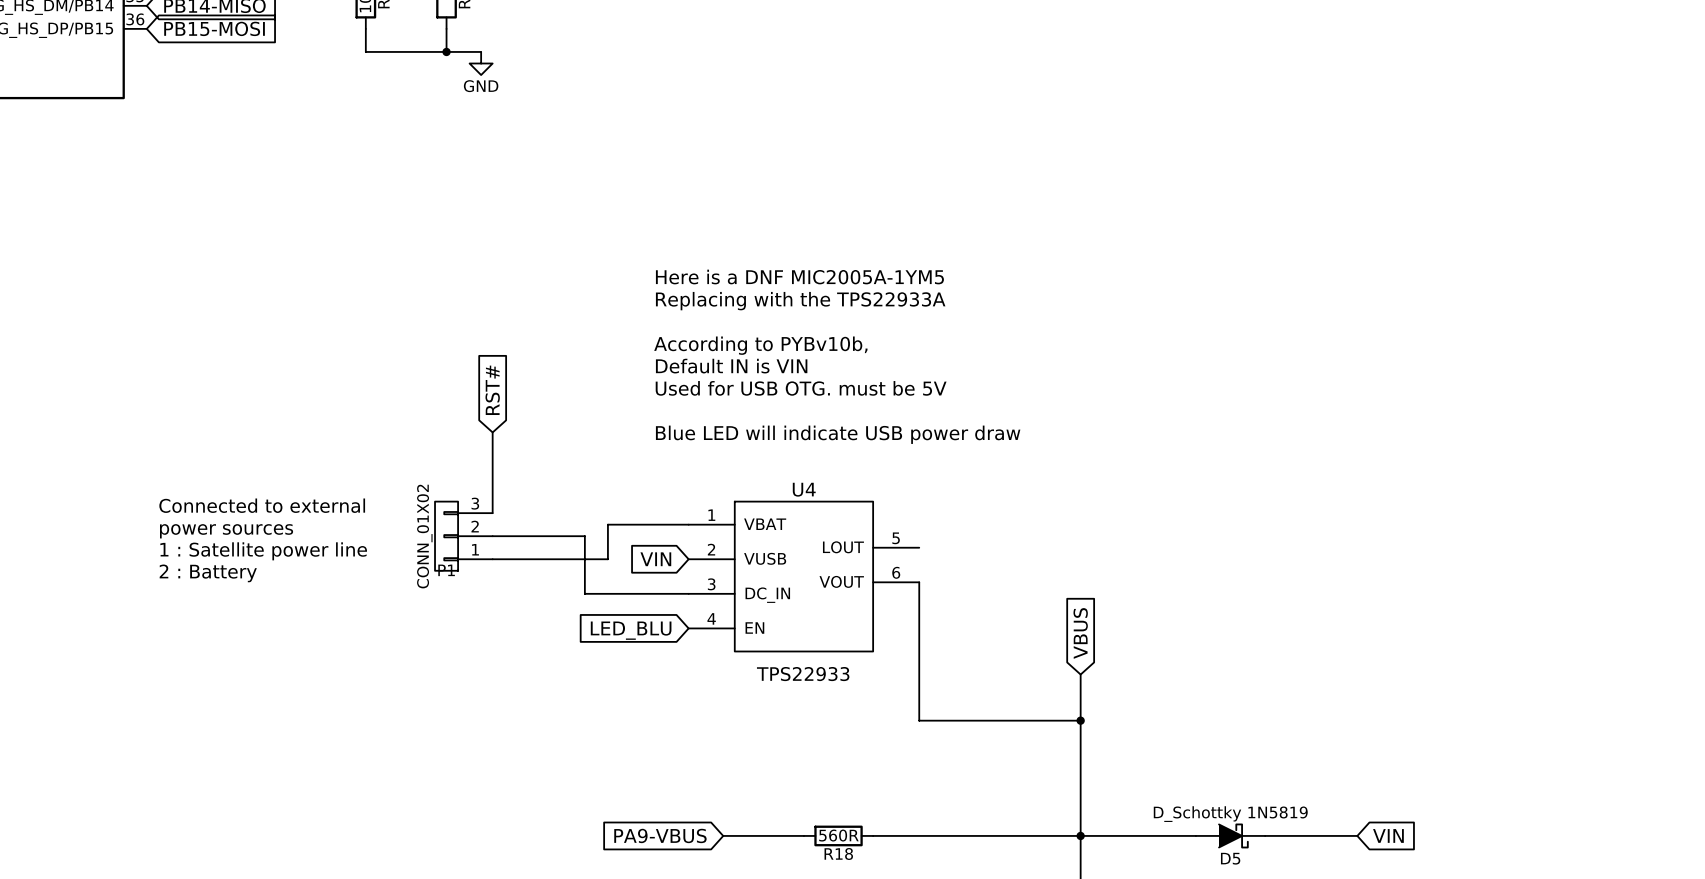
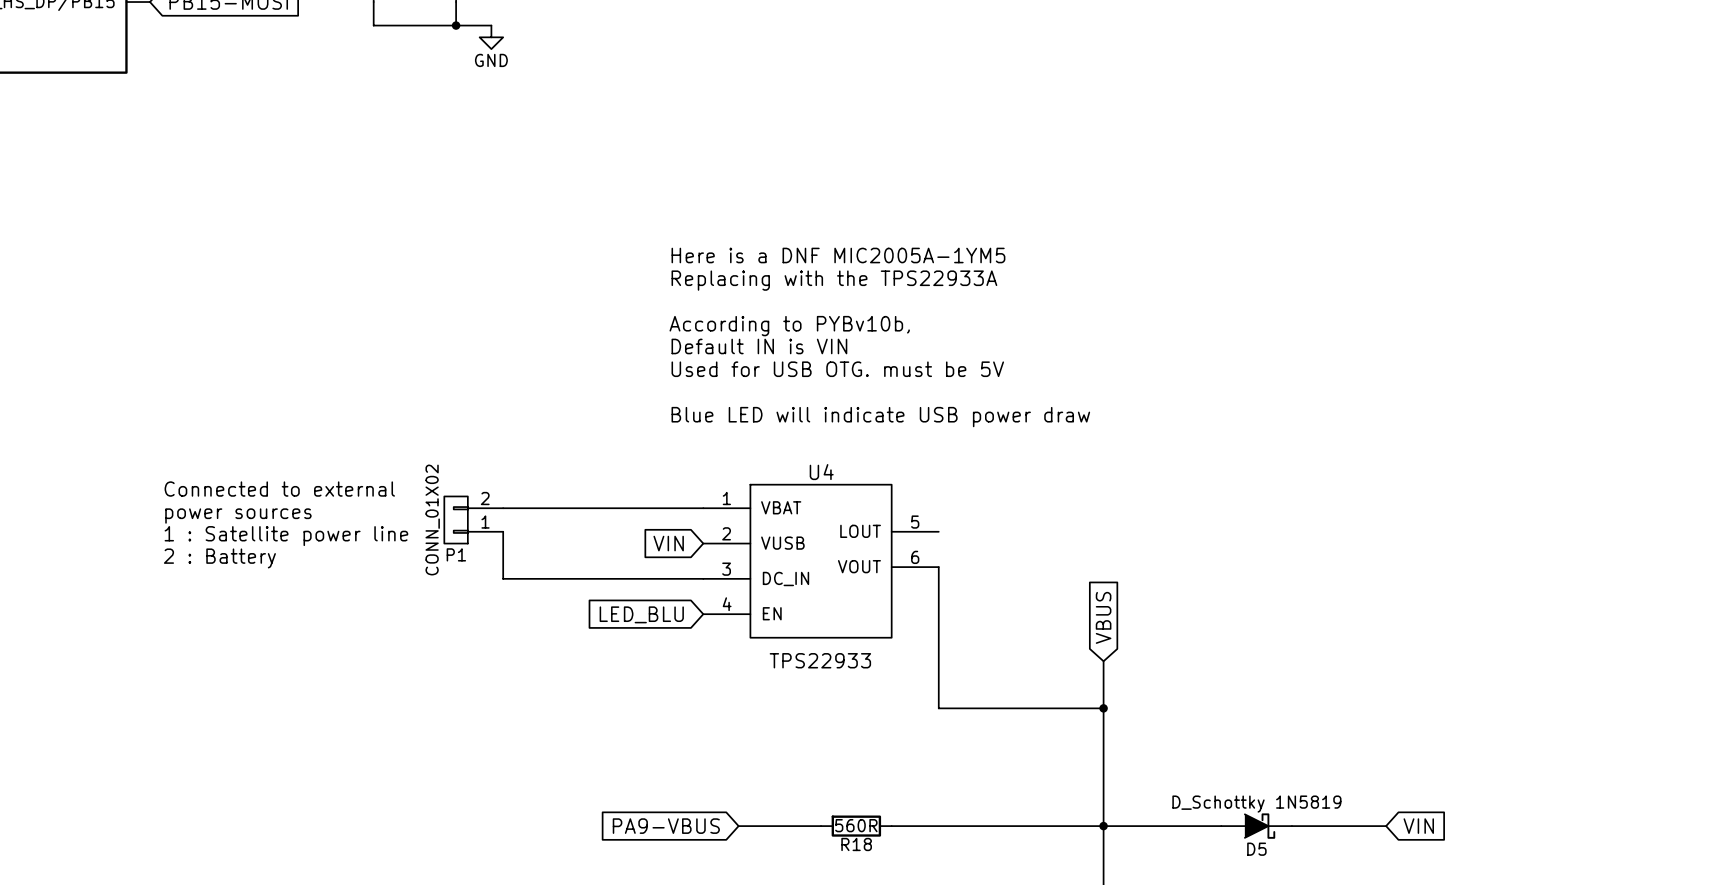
global label: RST# (492, 390) -> none
wire: (492, 432) (492, 513) -> none
P1 symbol: [435, 501, 493, 571] -> [444, 496, 504, 544]
wire: (607, 524) (607, 559) (492, 559) -> (620, 508) (503, 508)
wire: (492, 536) (584, 536) (584, 593) -> (503, 531) (503, 578) (597, 578)

